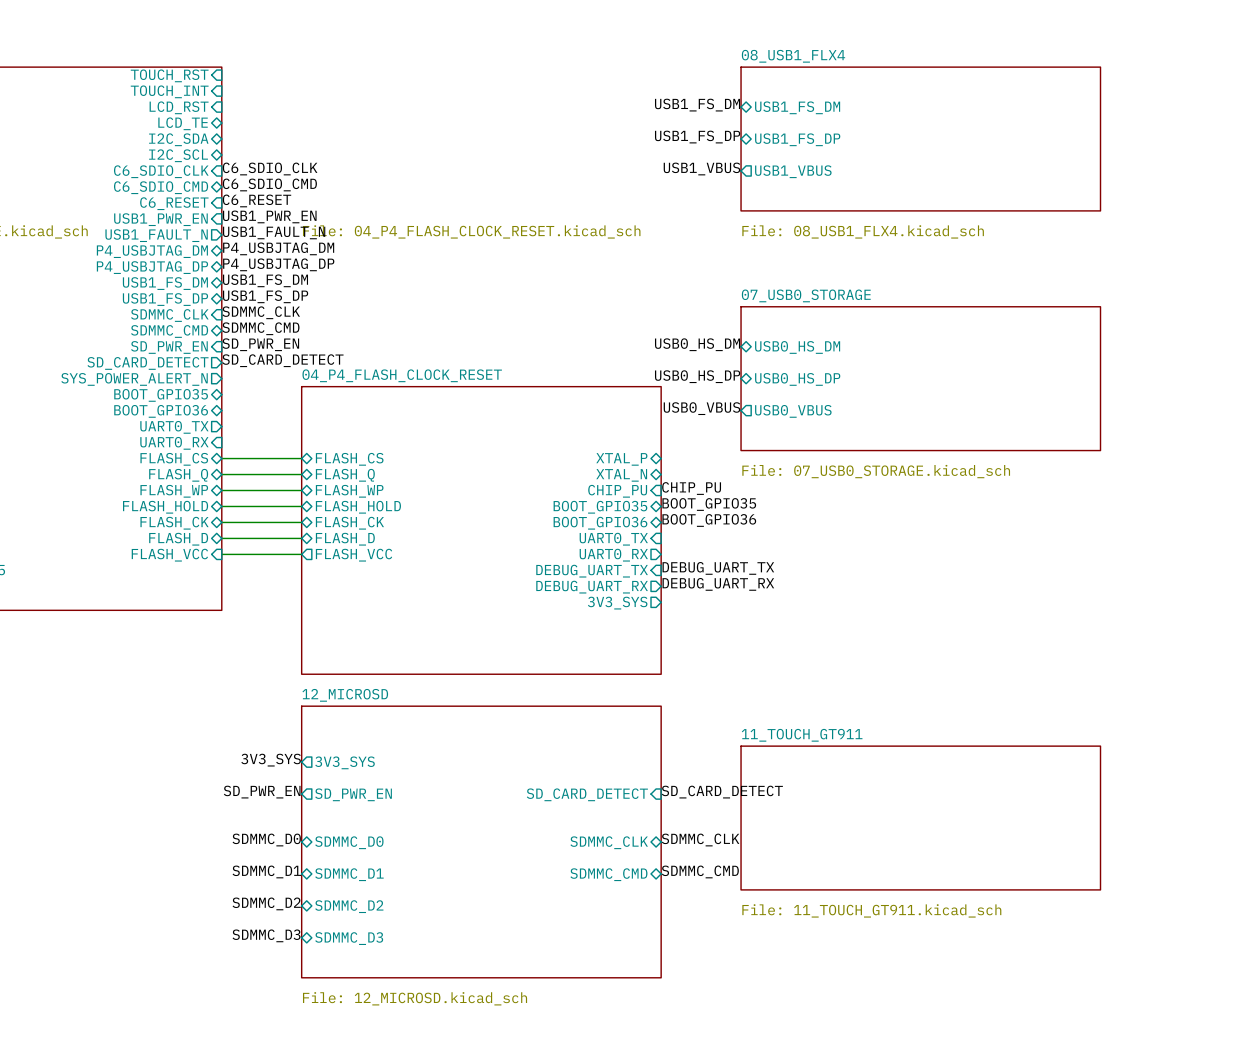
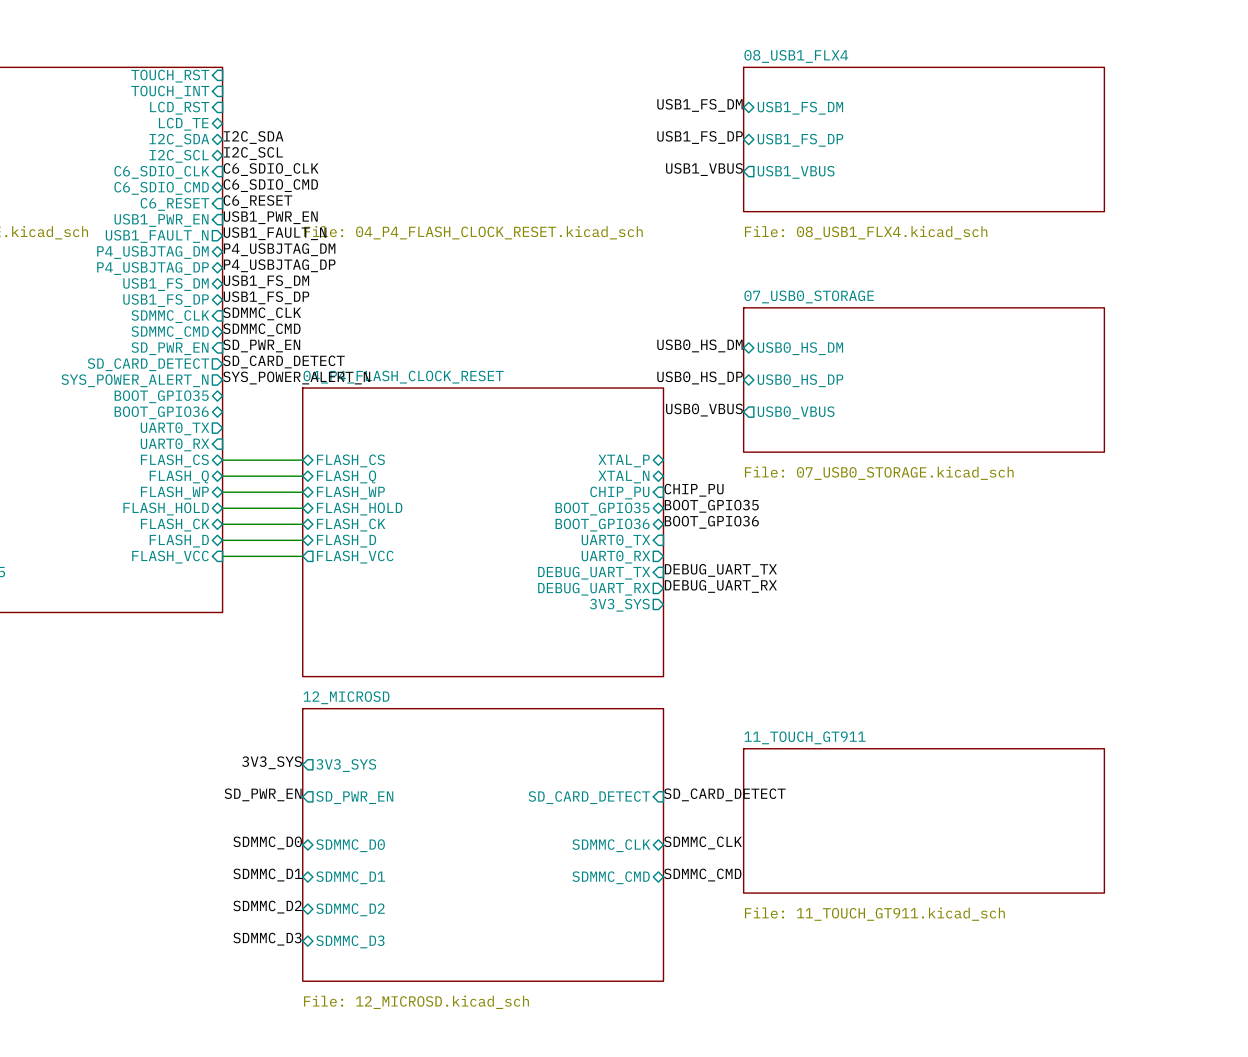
label: none -> I2C_SDA (253, 137)
label: none -> I2C_SCL (253, 153)
label: none -> SYS_POWER_ALERT_N (296, 378)

